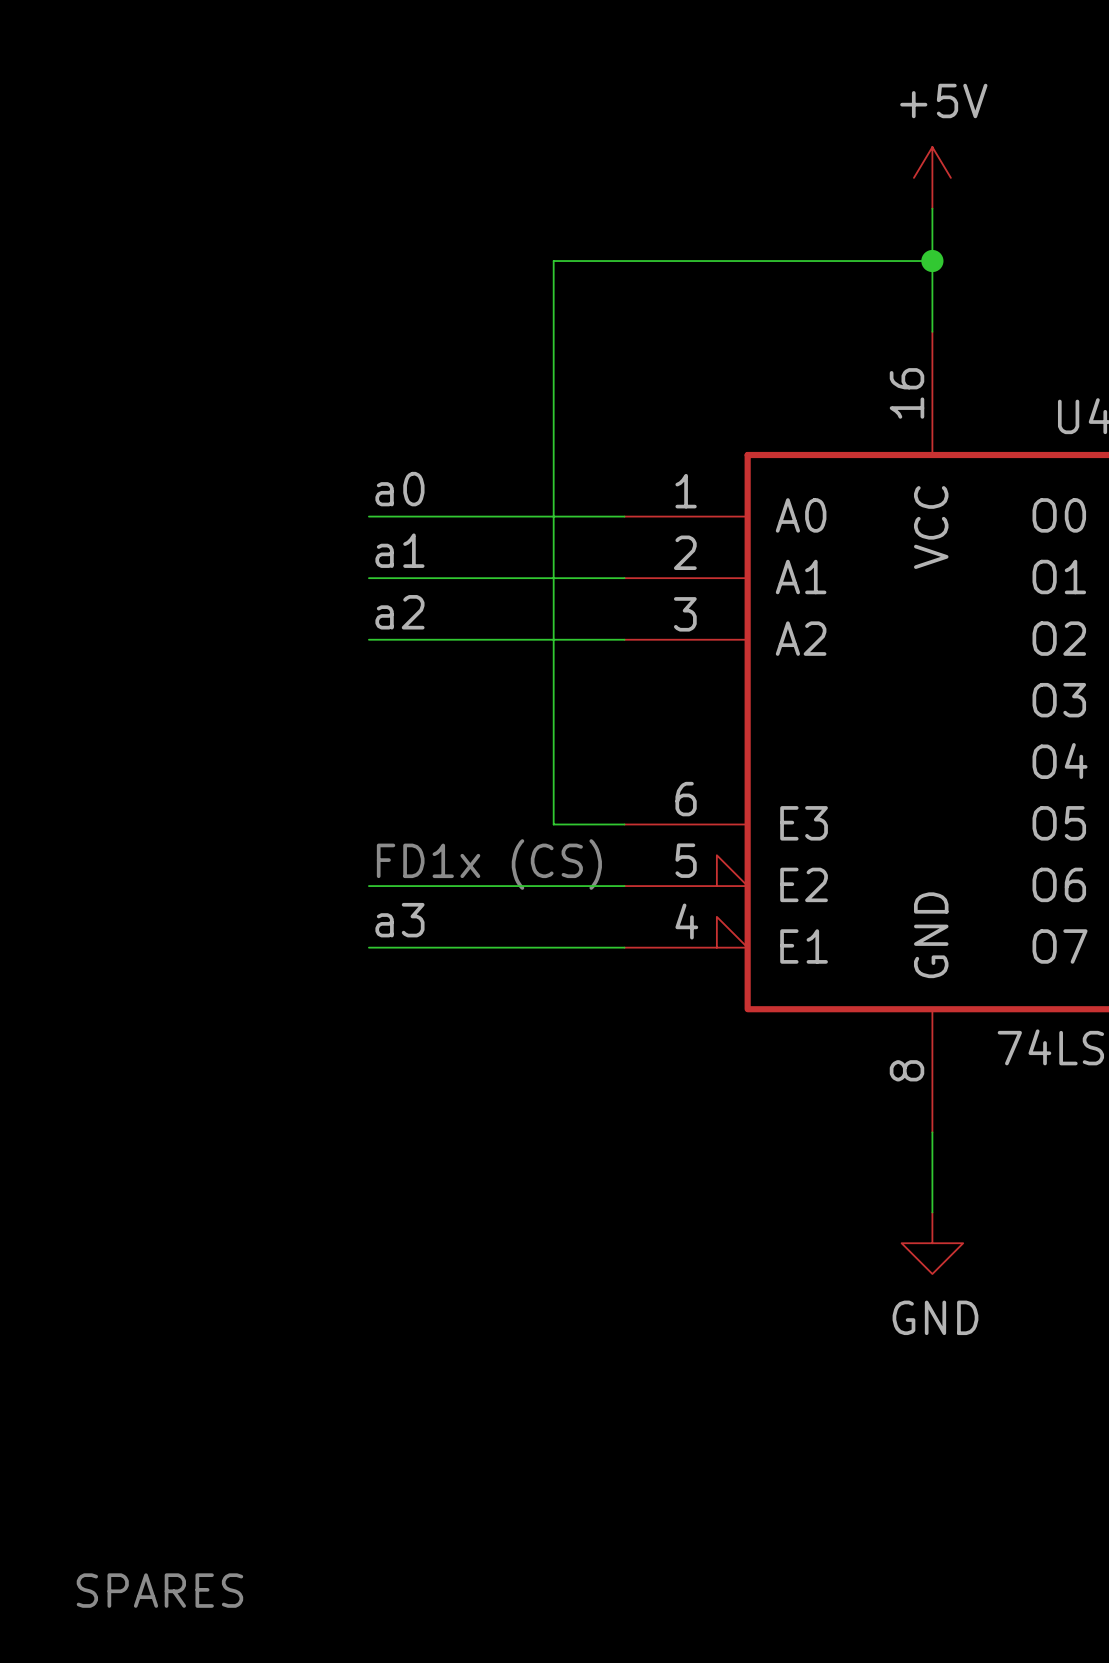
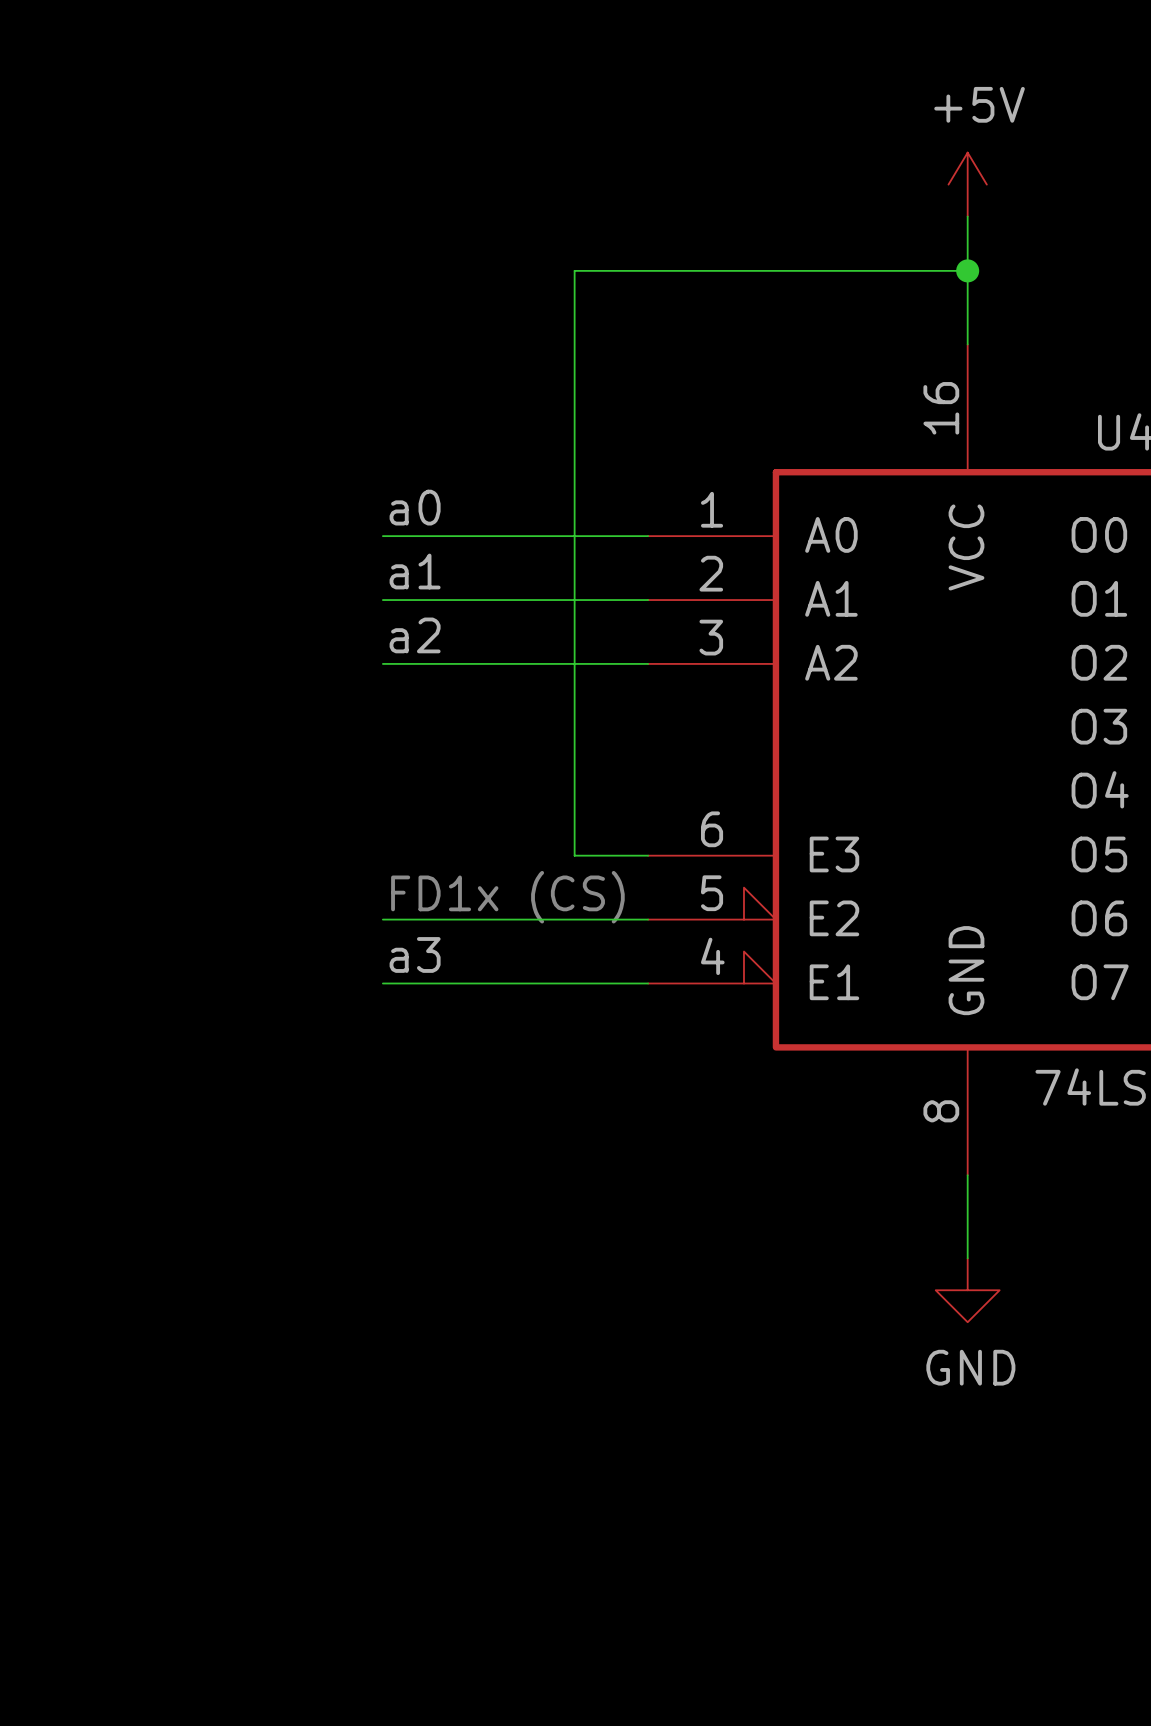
text: SPARES (159, 1590) -> none

